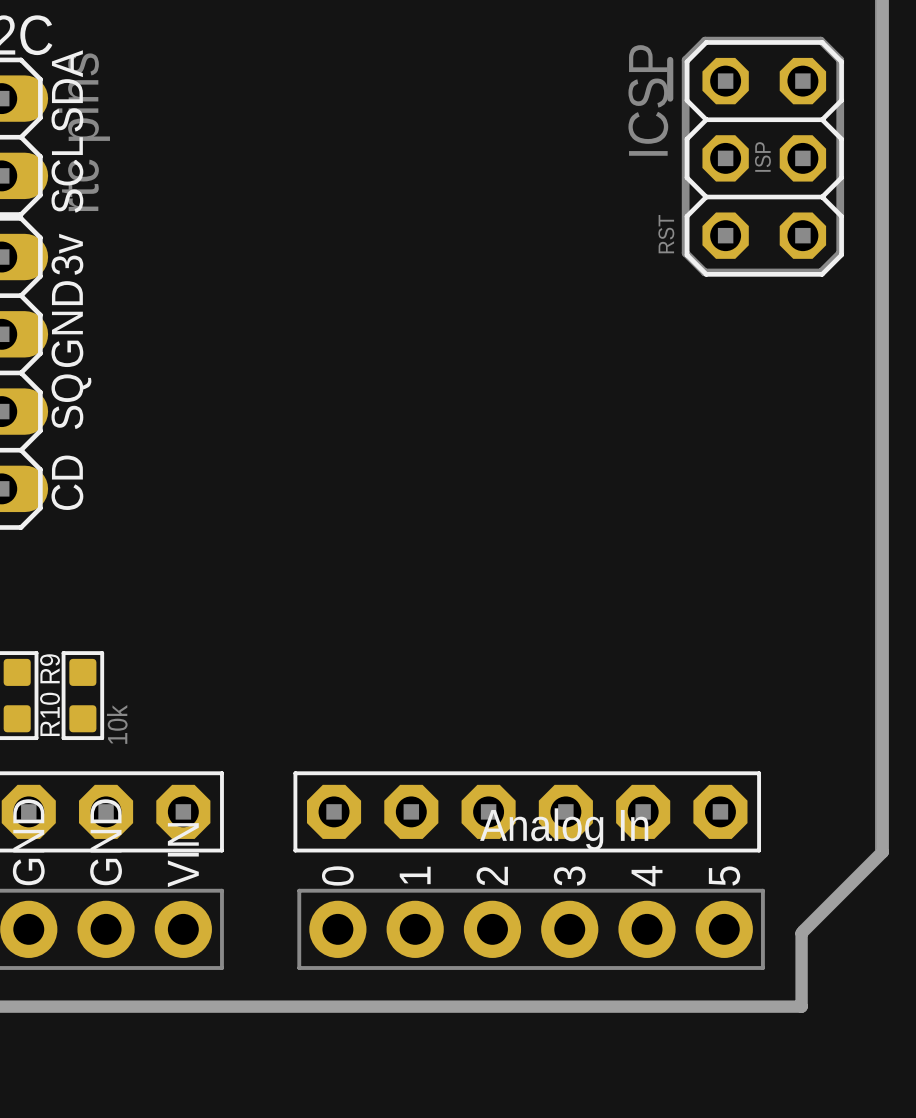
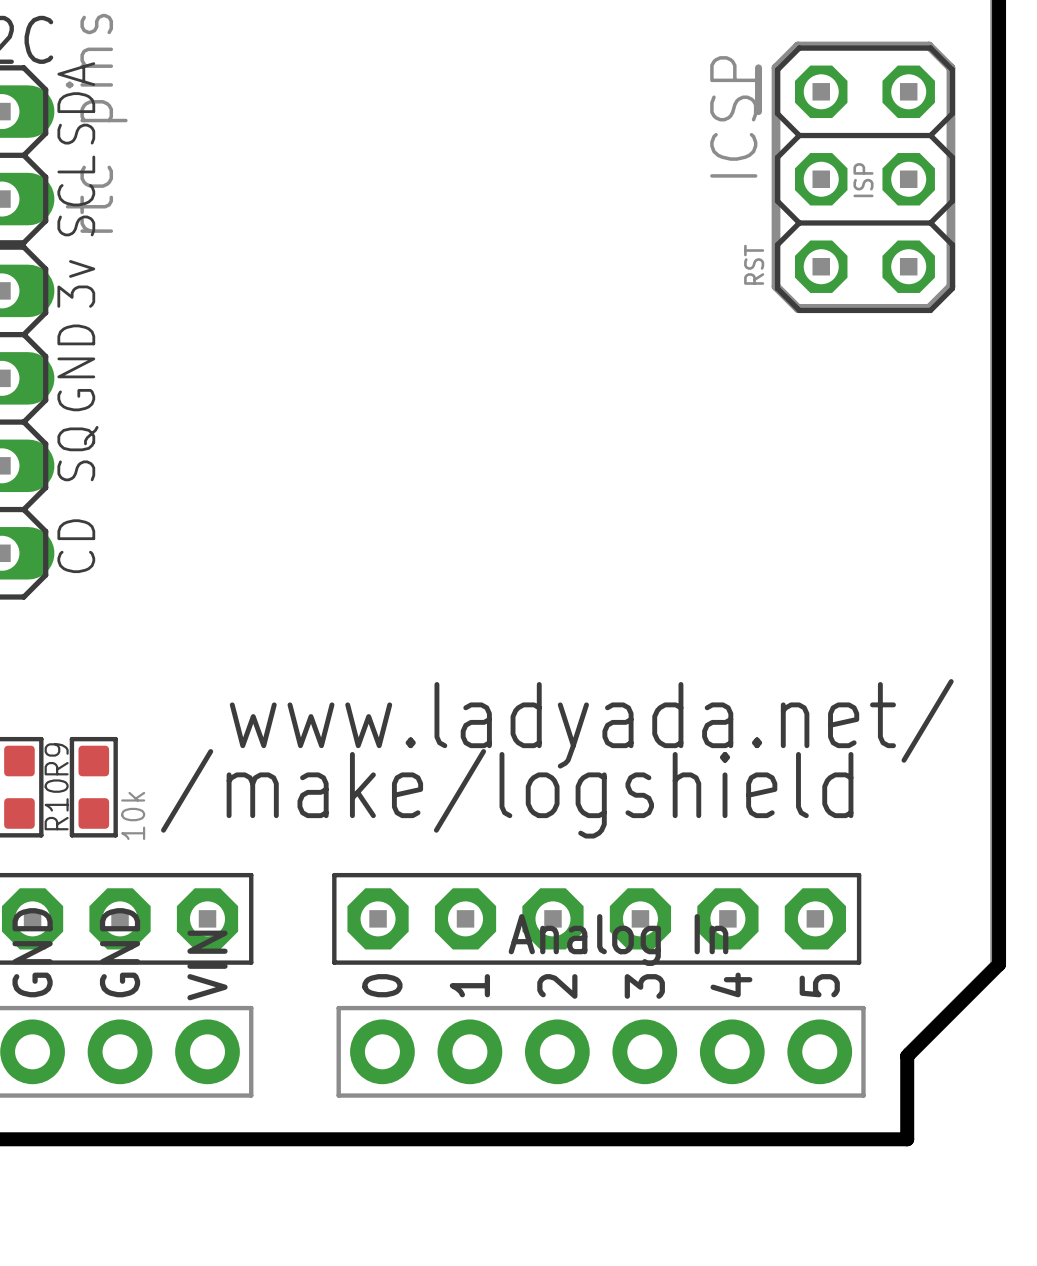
text: none -> www.ladyada.net/ (591, 723)
text: none -> /make/logshield (507, 793)

